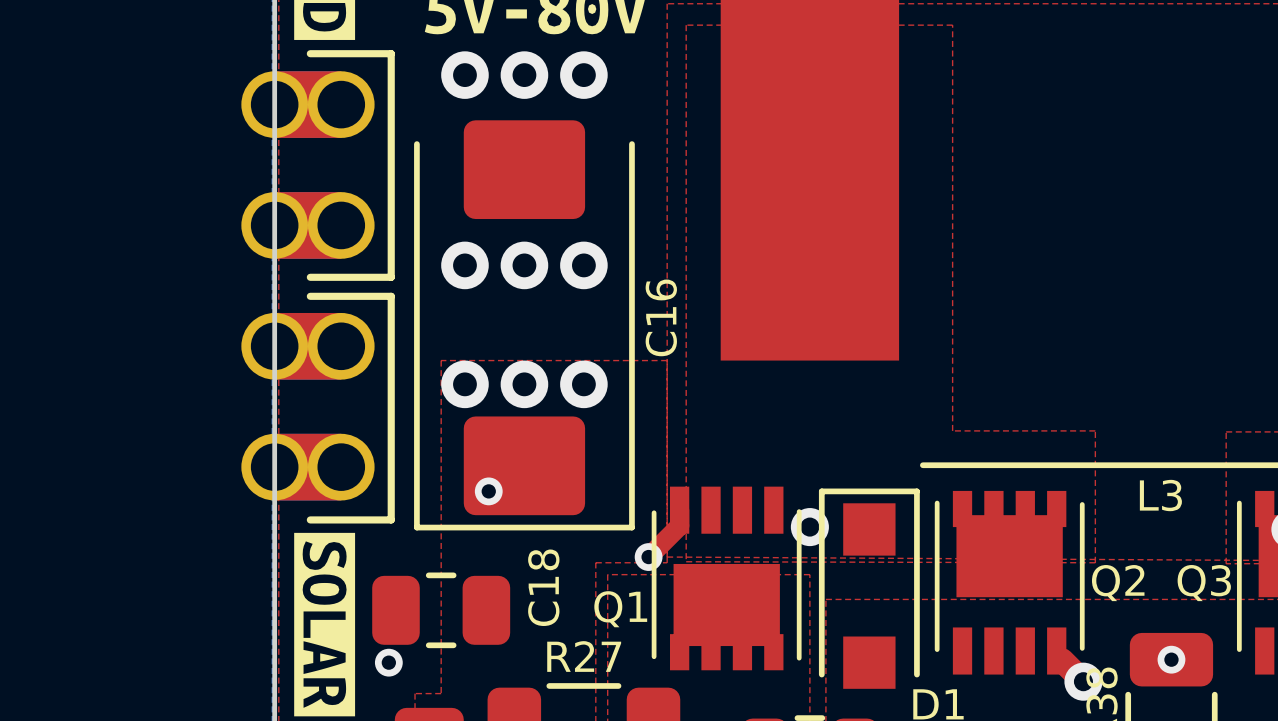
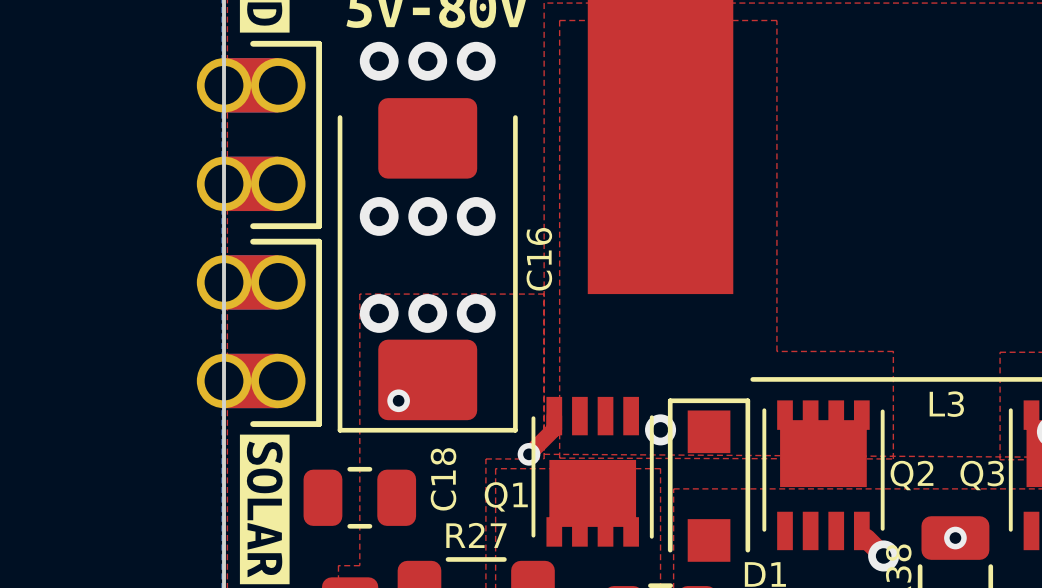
via: (388, 662) -> none

